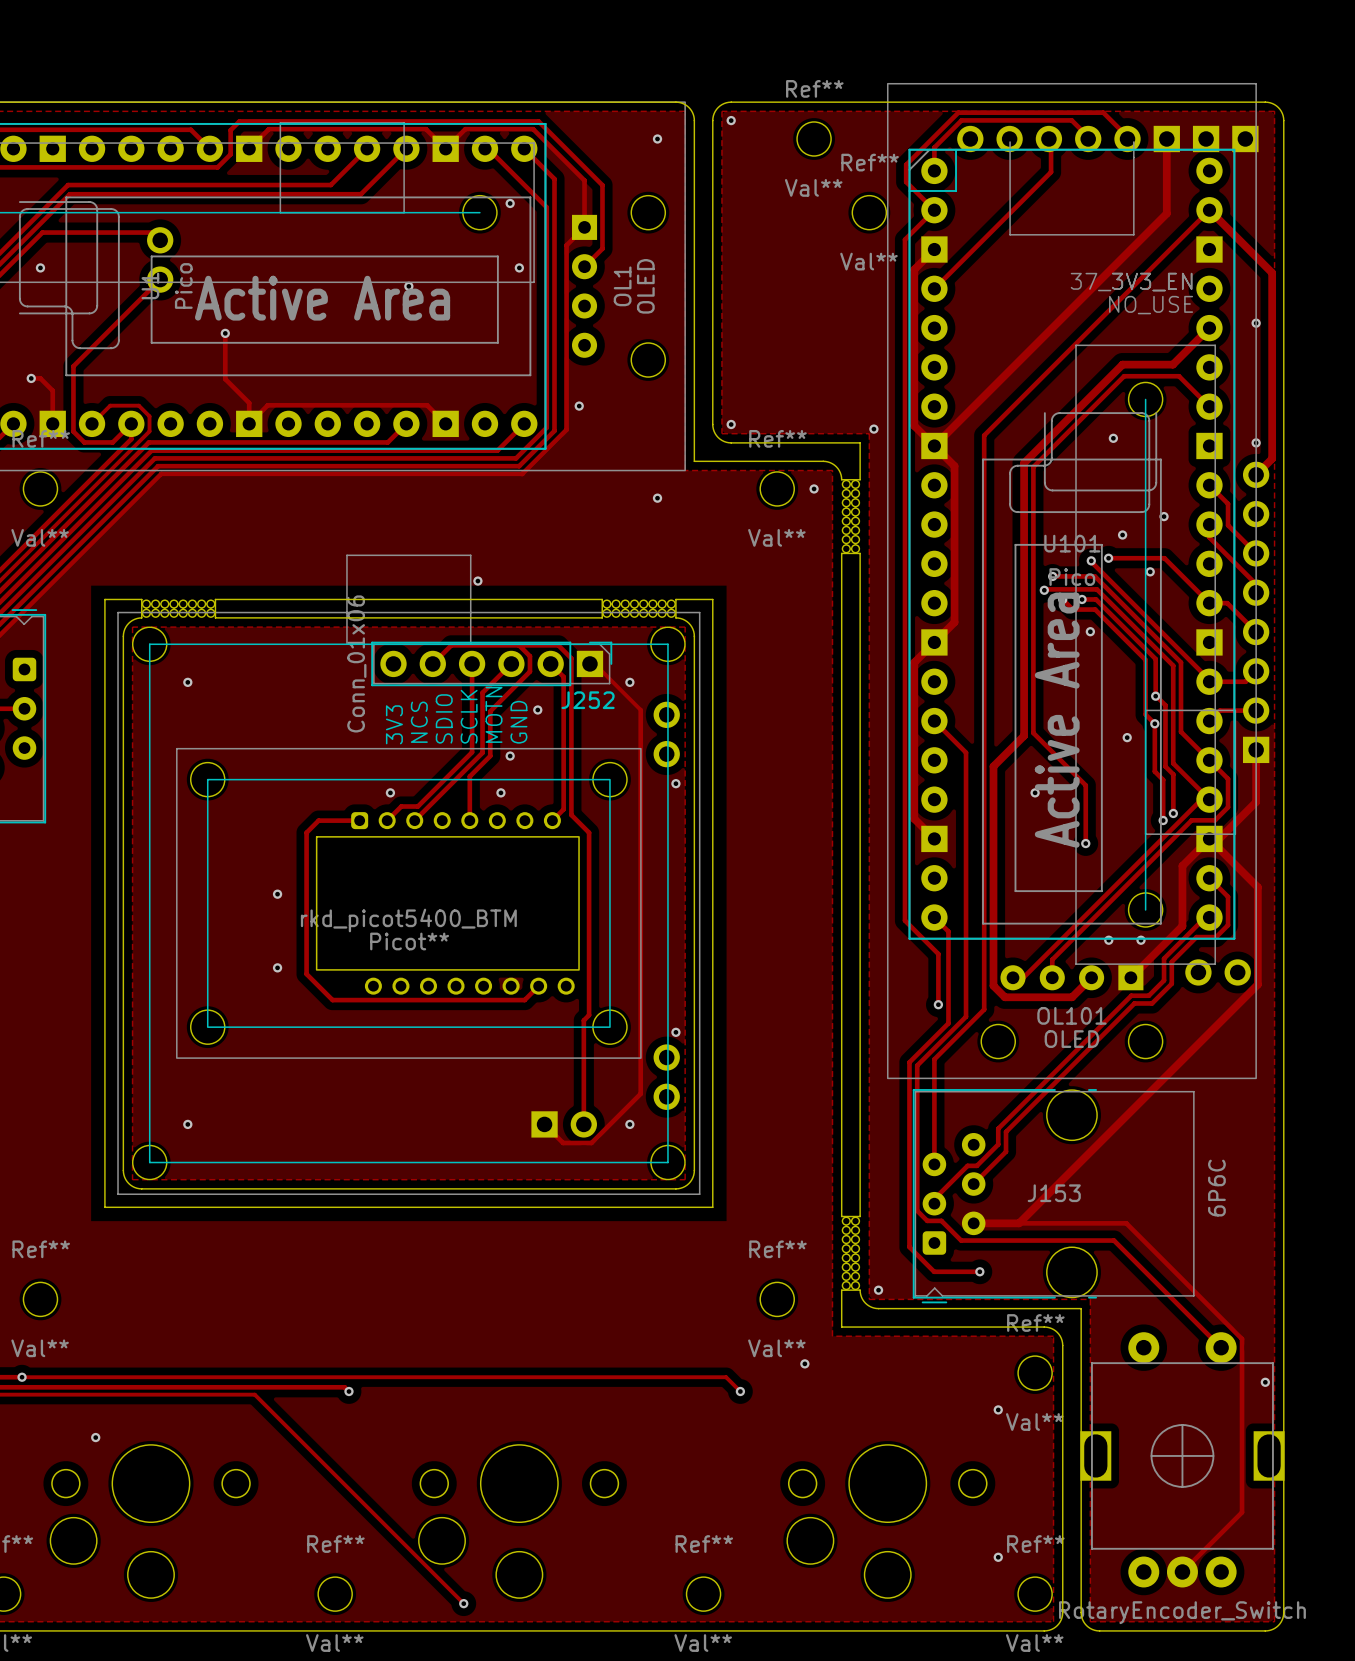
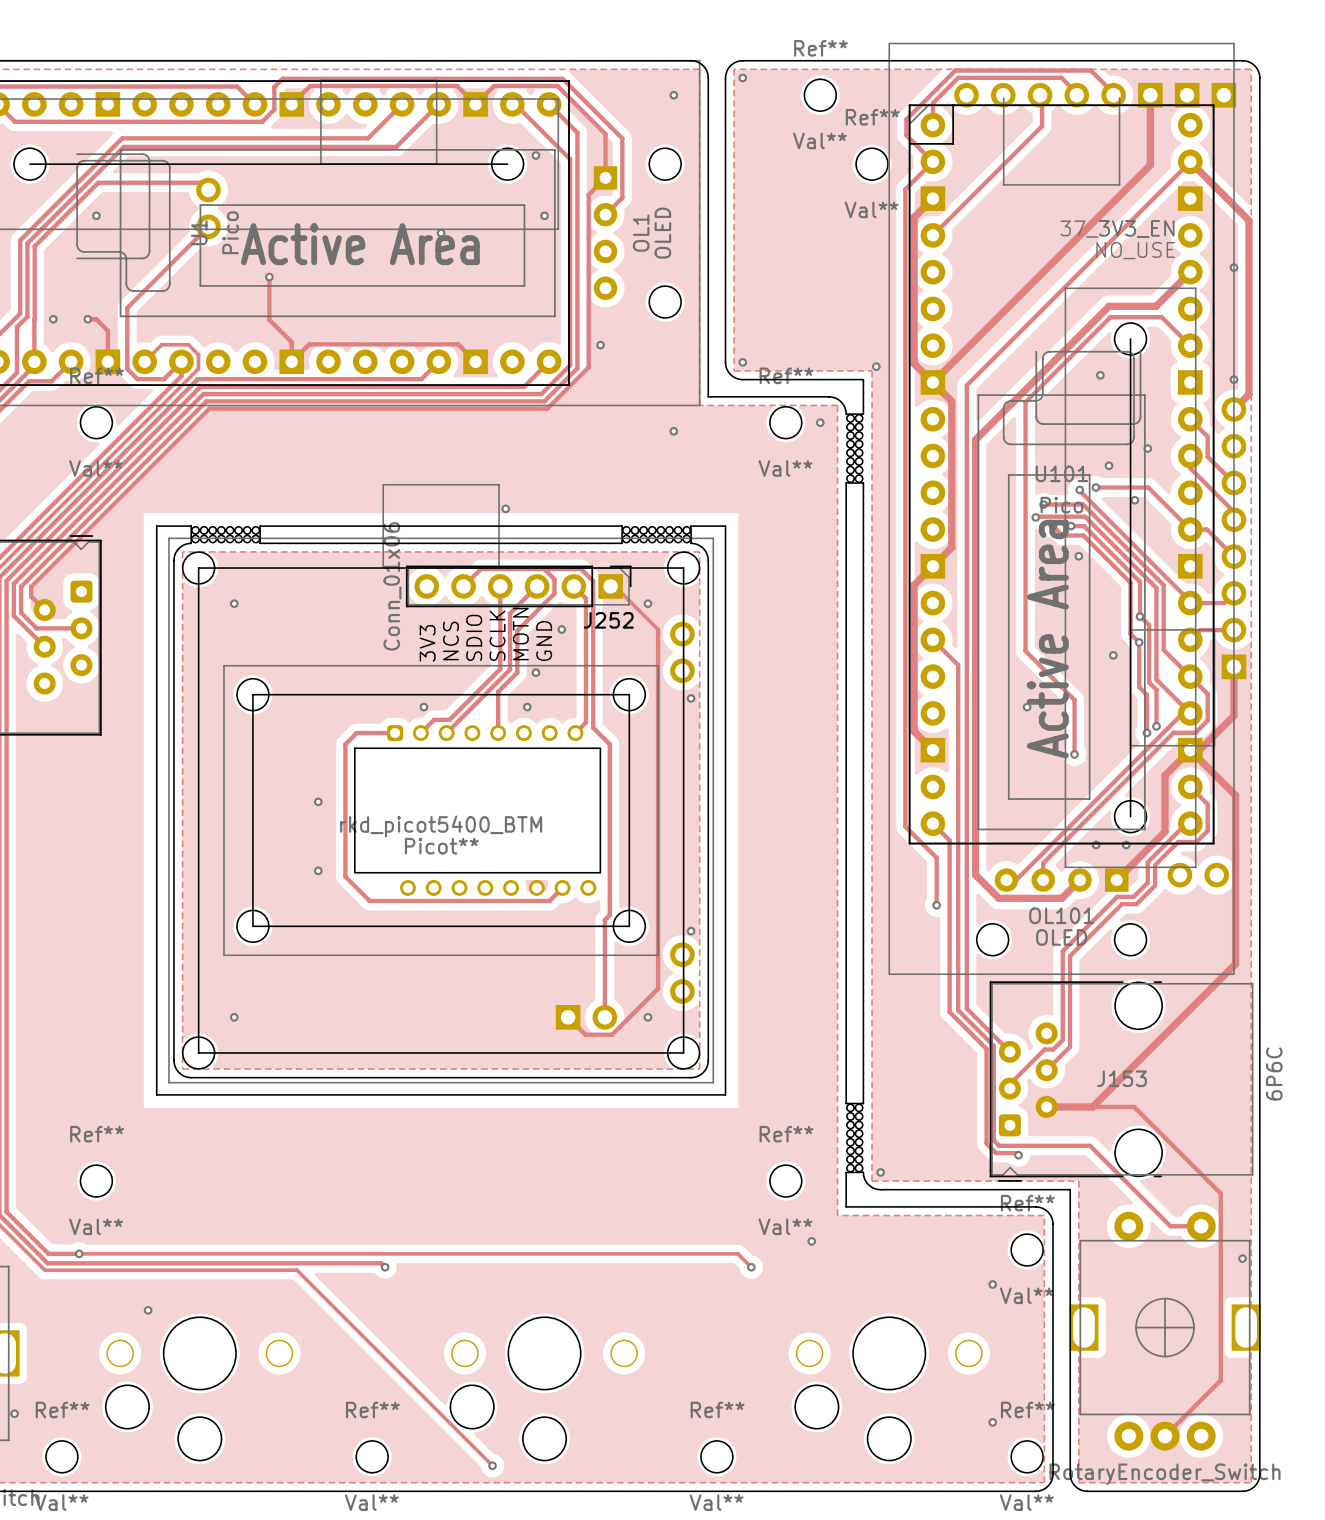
track: (984, 435) (984, 1009) (934, 1059) (934, 1164) -> (979, 372) (966, 385) (966, 1008) (1009, 1051)
track: (1024, 463) (1024, 735) (993, 766) (993, 985) -> (1016, 398) (975, 439) (975, 874) (988, 887)
track: (961, 748) (966, 752) (966, 1016) (917, 1065) (917, 1210) (927, 1220) (941, 1220) (961, 1240) (1113, 1240) (1221, 1347) -> (958, 665) (958, 1010) (993, 1045) (993, 1140) (999, 1145) (1090, 1145) (1170, 1226) (1201, 1226)
track: (948, 931) (948, 1023) (909, 1062) (909, 1247) (934, 1271) (979, 1271) -> (946, 836) (949, 840) (949, 1012) (986, 1048) (986, 1143) (996, 1153) (1016, 1153) (1018, 1155)
track: (1257, 984) (1019, 1223) (973, 1223) (1126, 1223) (1242, 1339) -> (1235, 886) (1235, 964) (1092, 1106) (1046, 1106) (1134, 1106) (1220, 1193) (1220, 1218)
track: (1136, 1003) (1006, 1131) (1006, 1151) (973, 1184) -> (1121, 904) (1070, 956) (1070, 1046) (1046, 1070)
track: (1073, 1053) (998, 1128) (998, 1144) (976, 1165) (967, 1165) (934, 1199) (934, 1203) -> (1062, 951) (1062, 1040) (1053, 1049) (1044, 1049) (1009, 1084) (1009, 1088)
J153 position: (1053, 1196) -> (1121, 1081)
via position: (979, 1271) -> (1018, 1155)

